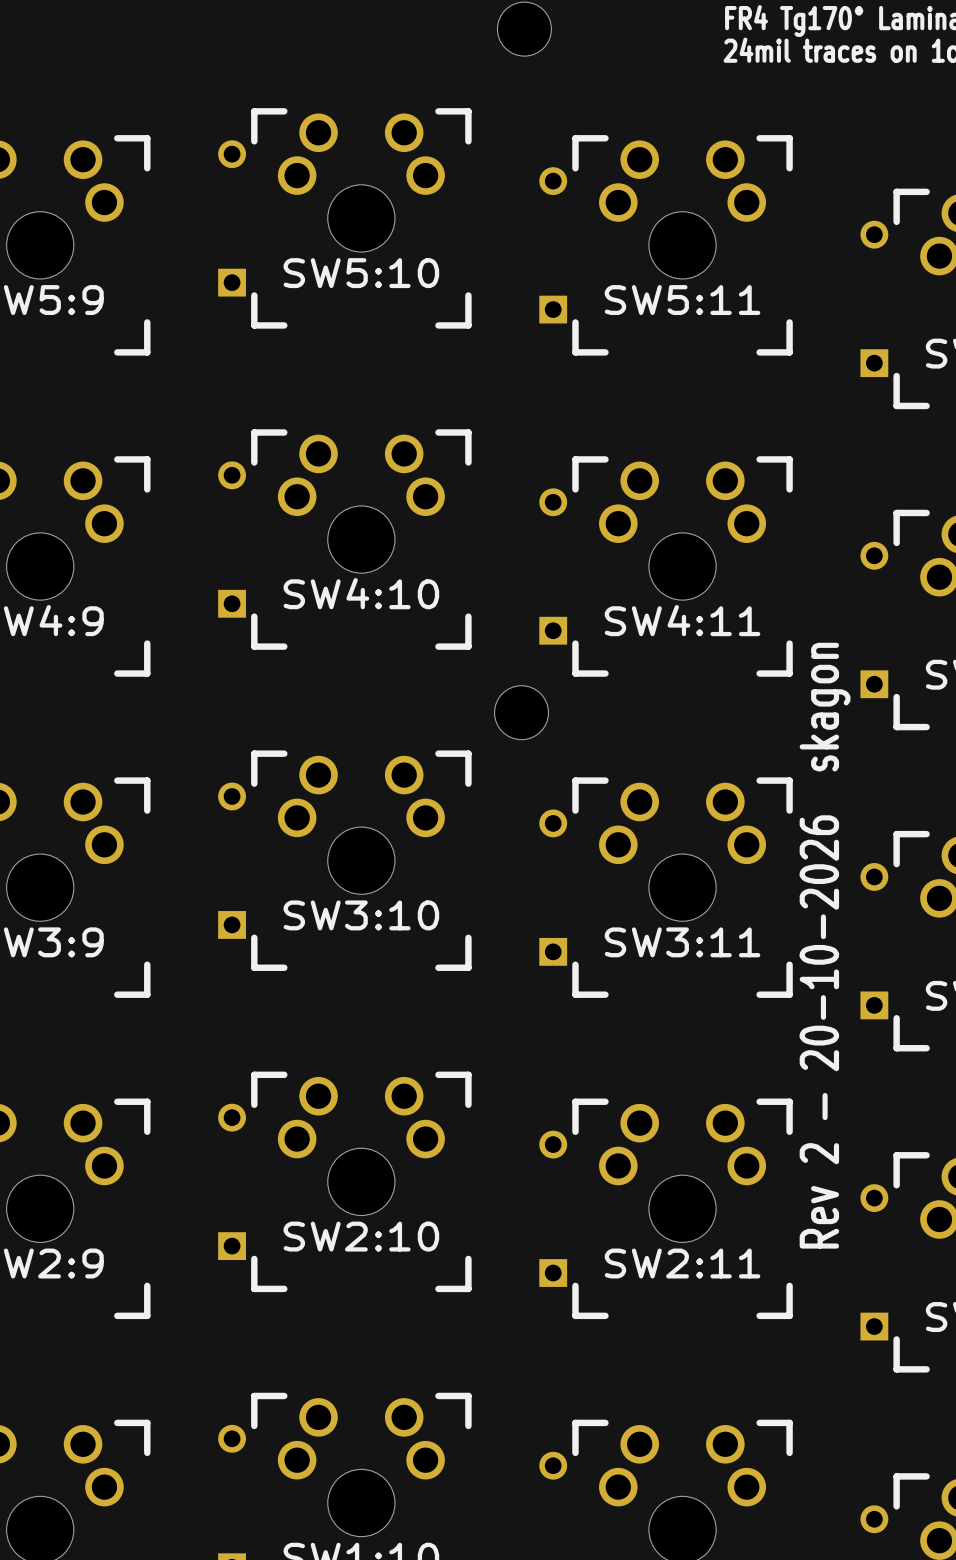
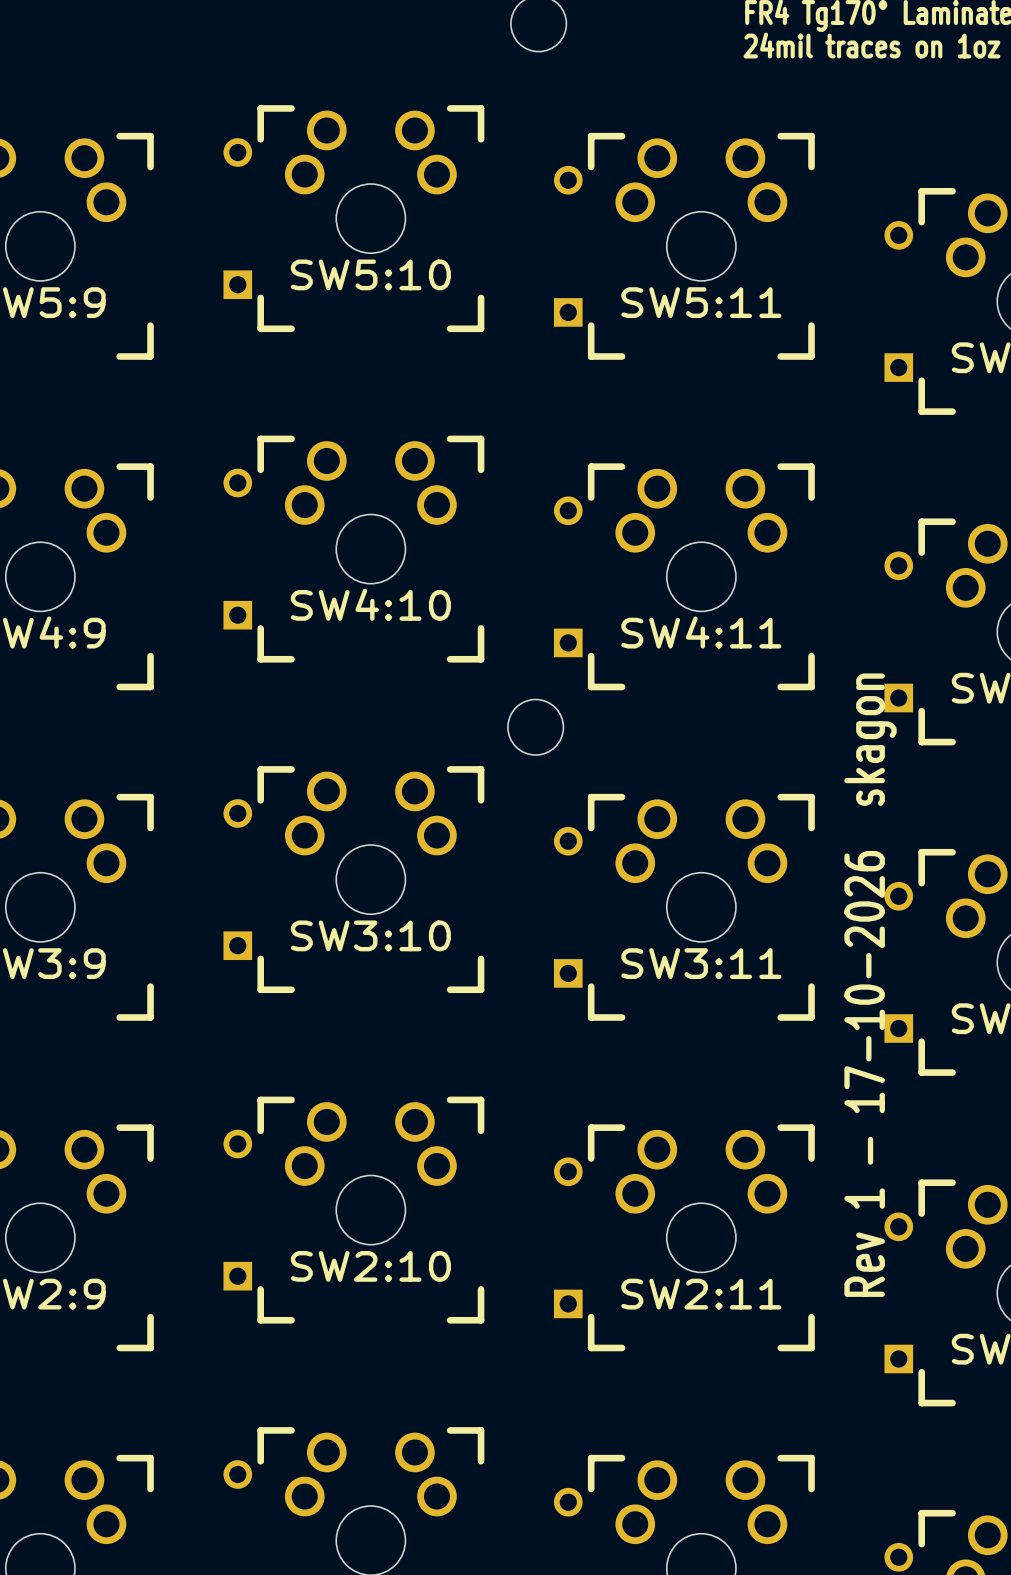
text: Rev 2 — 20-10-2026 skagon (825, 945) -> Rev 1 — 17-10-2026 skagon (870, 985)

